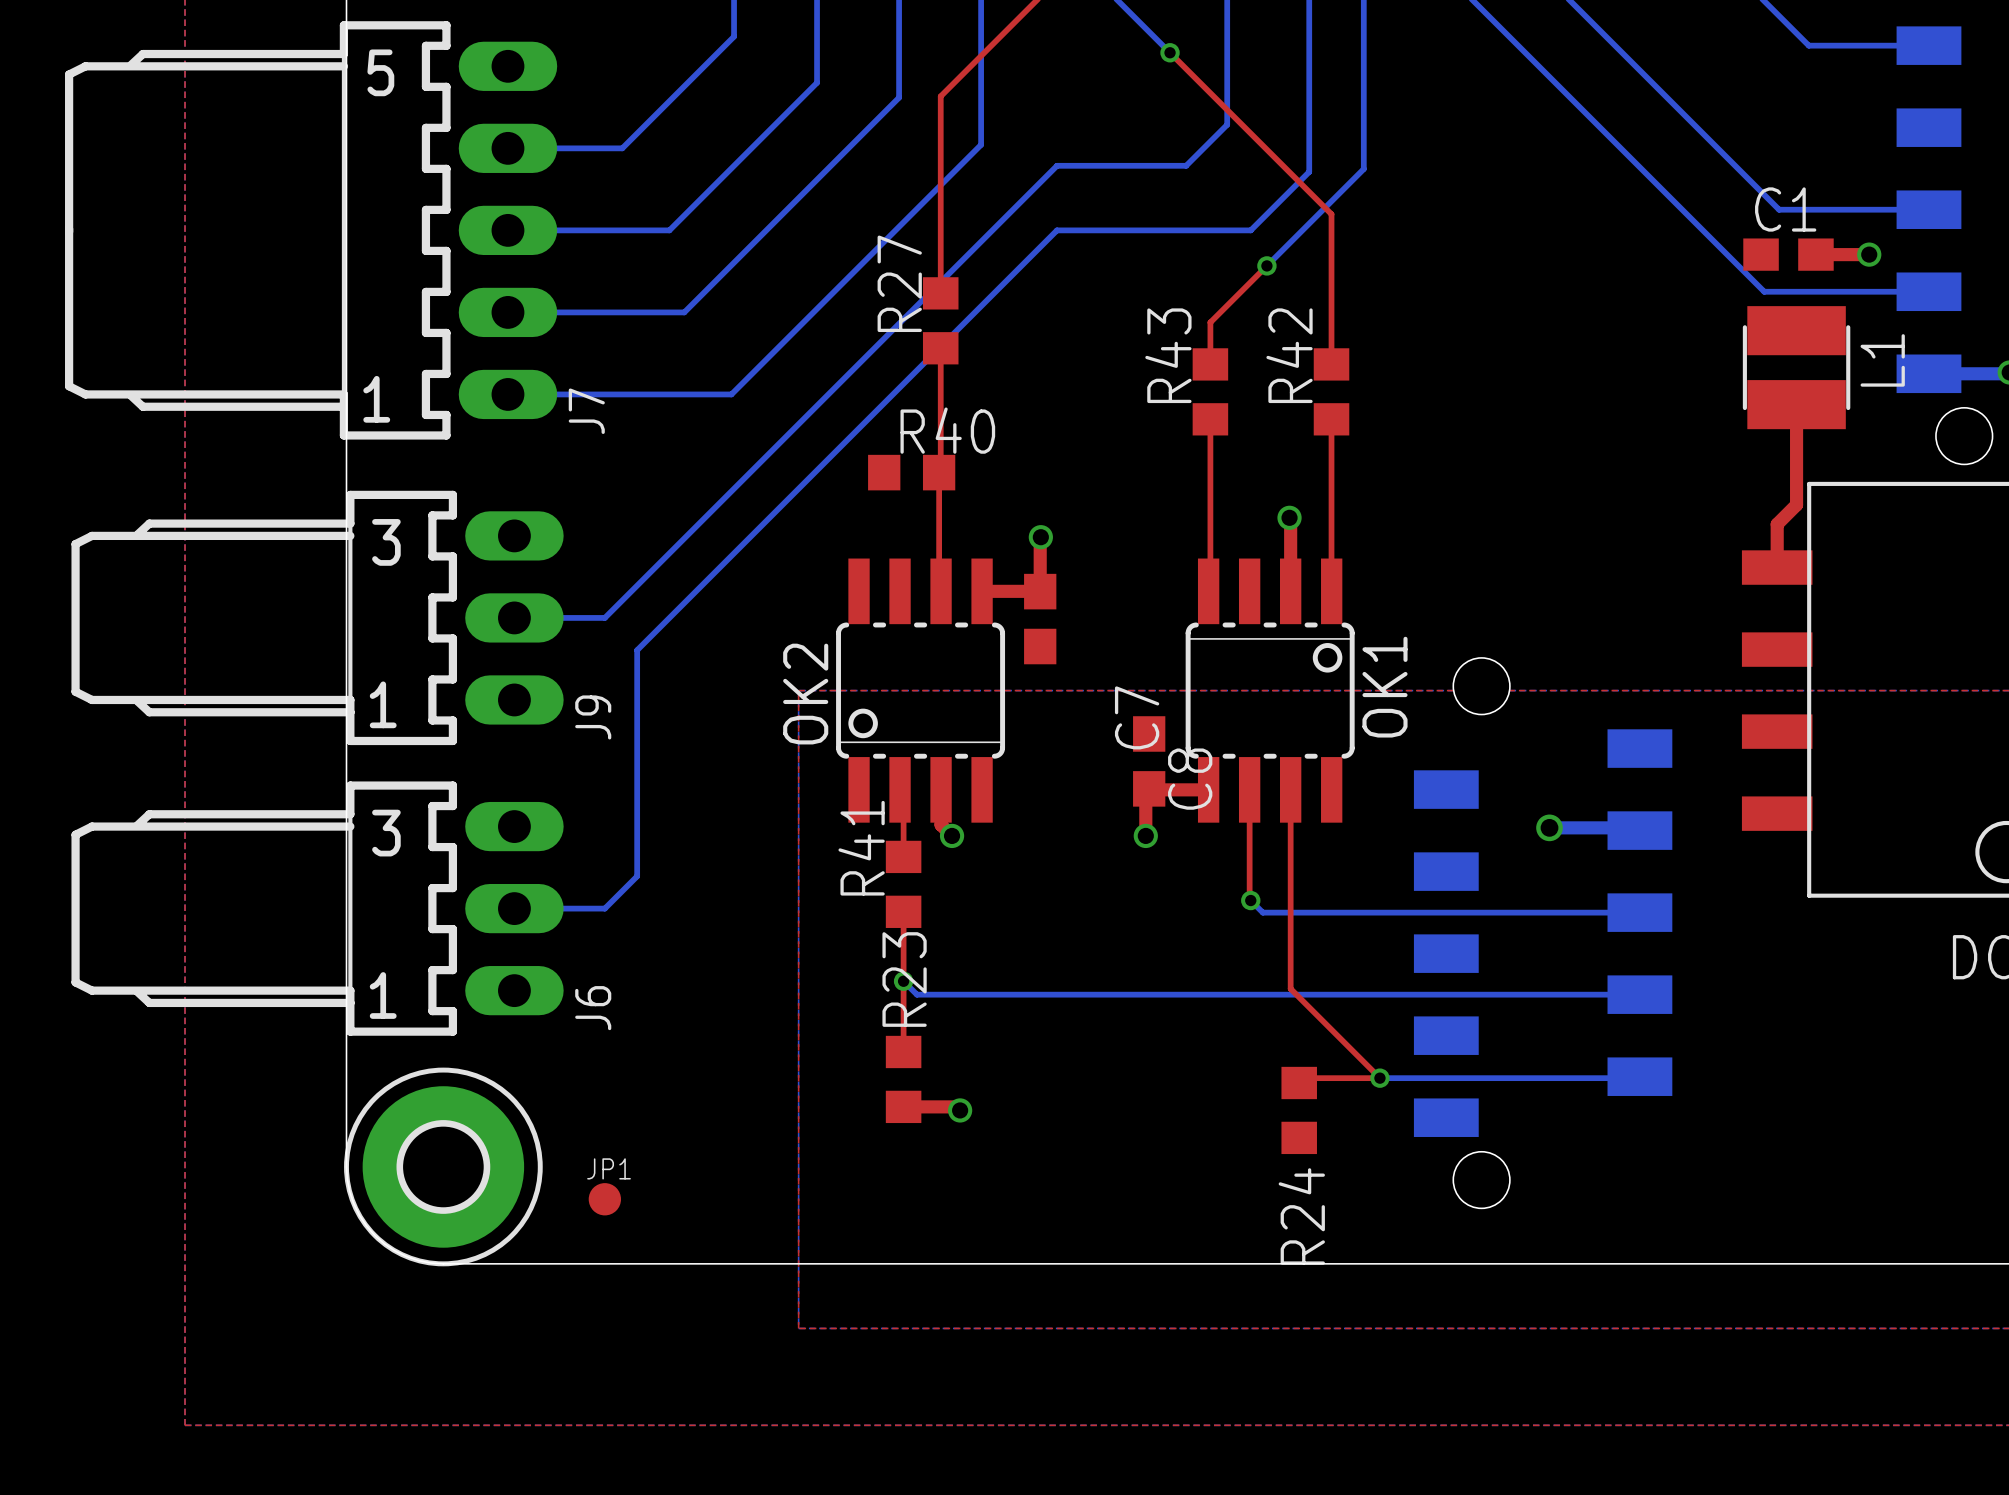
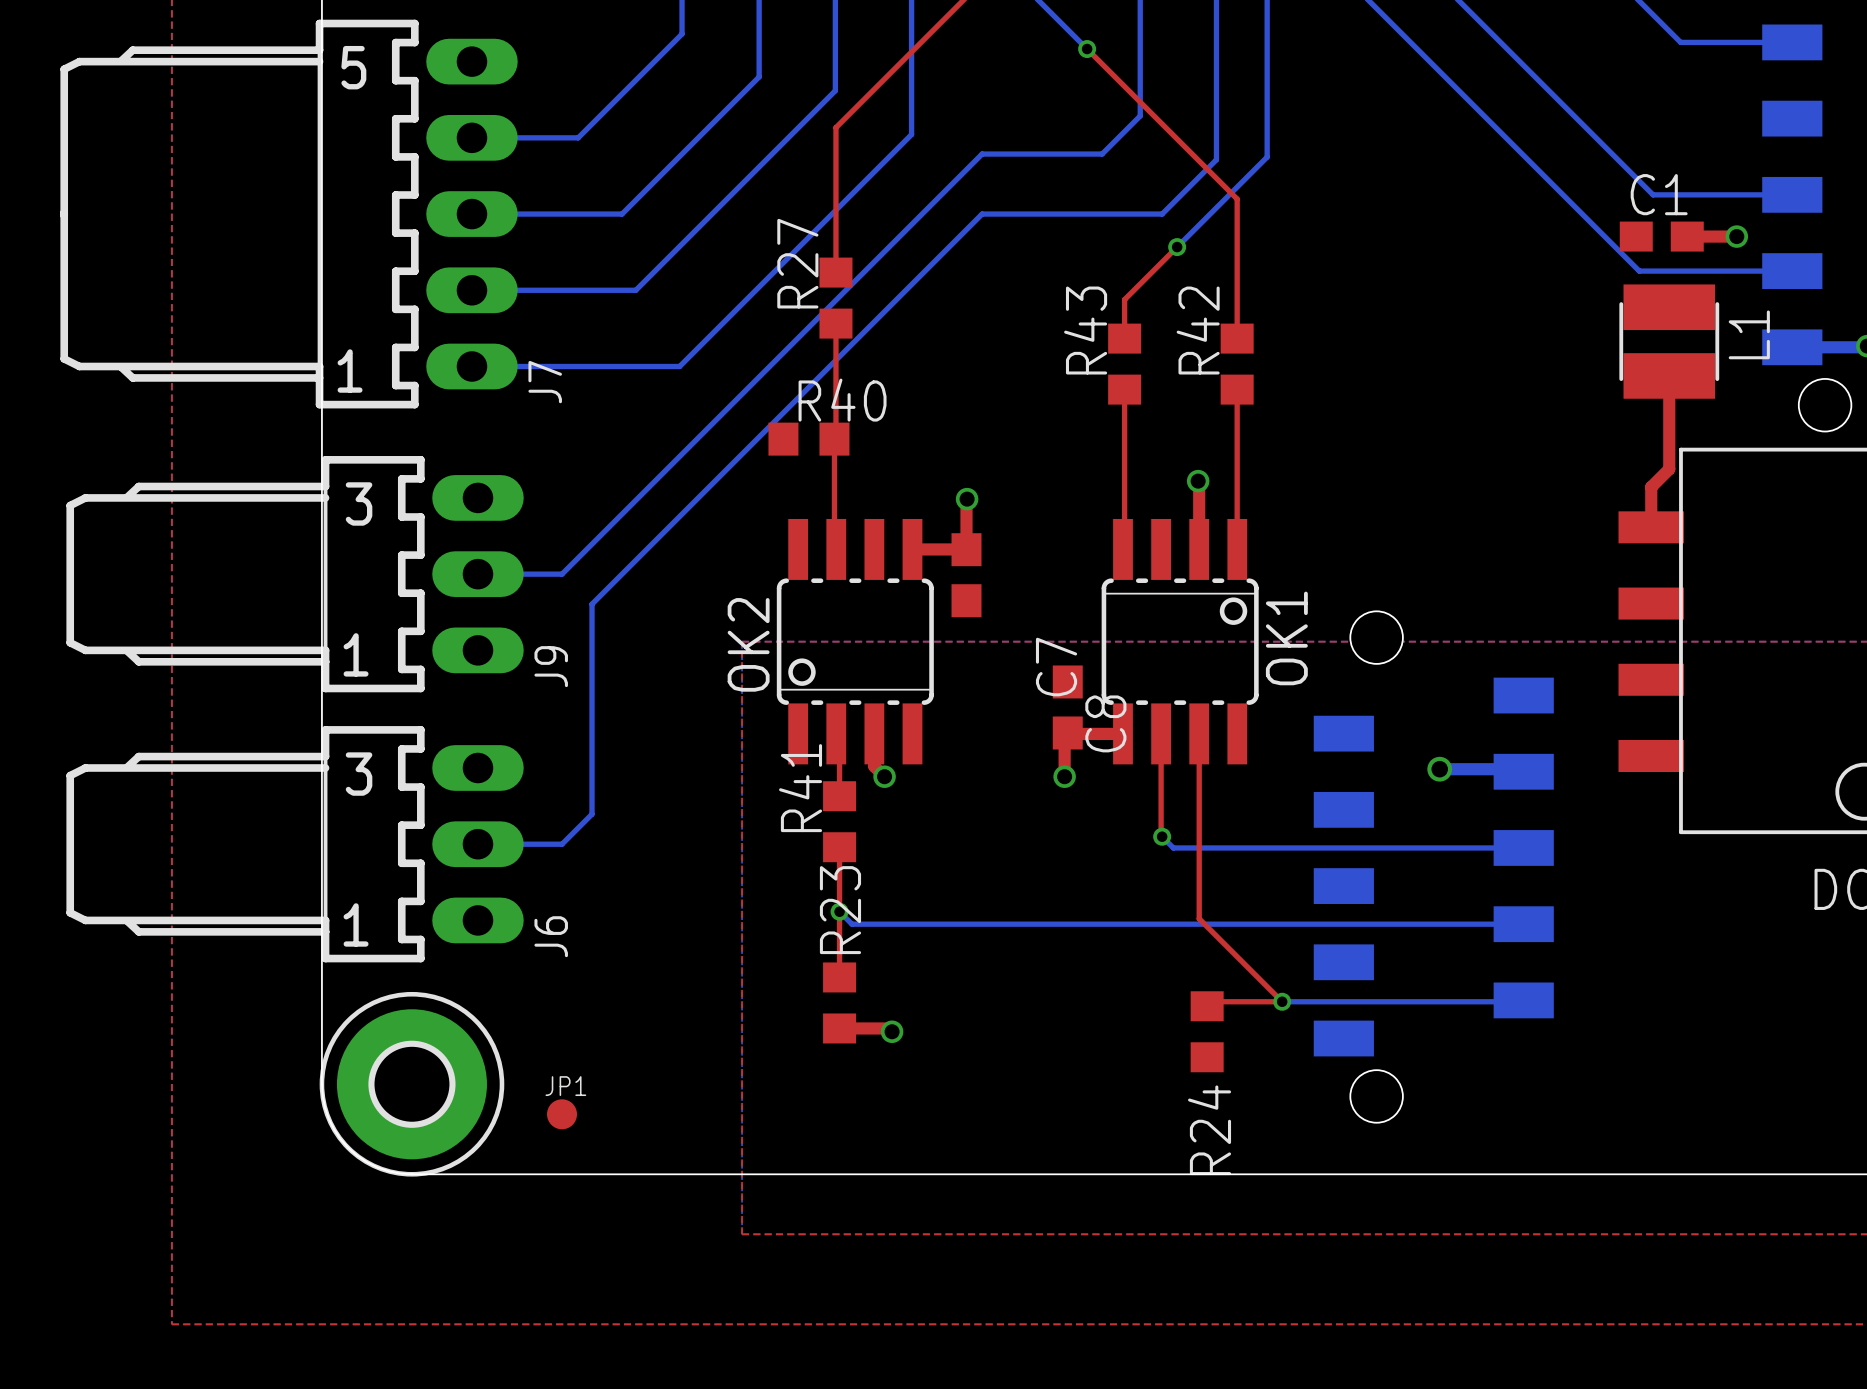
top track: (940, 96) (940, 293) -> (874, 89) (835, 127) (835, 272)
R27 position: (940, 320) -> (835, 298)
top track: none -> (835, 323) (834, 549) (836, 549)
top track: (940, 348) (939, 589) (941, 591) -> none
R40 position: (911, 472) -> (808, 439)

